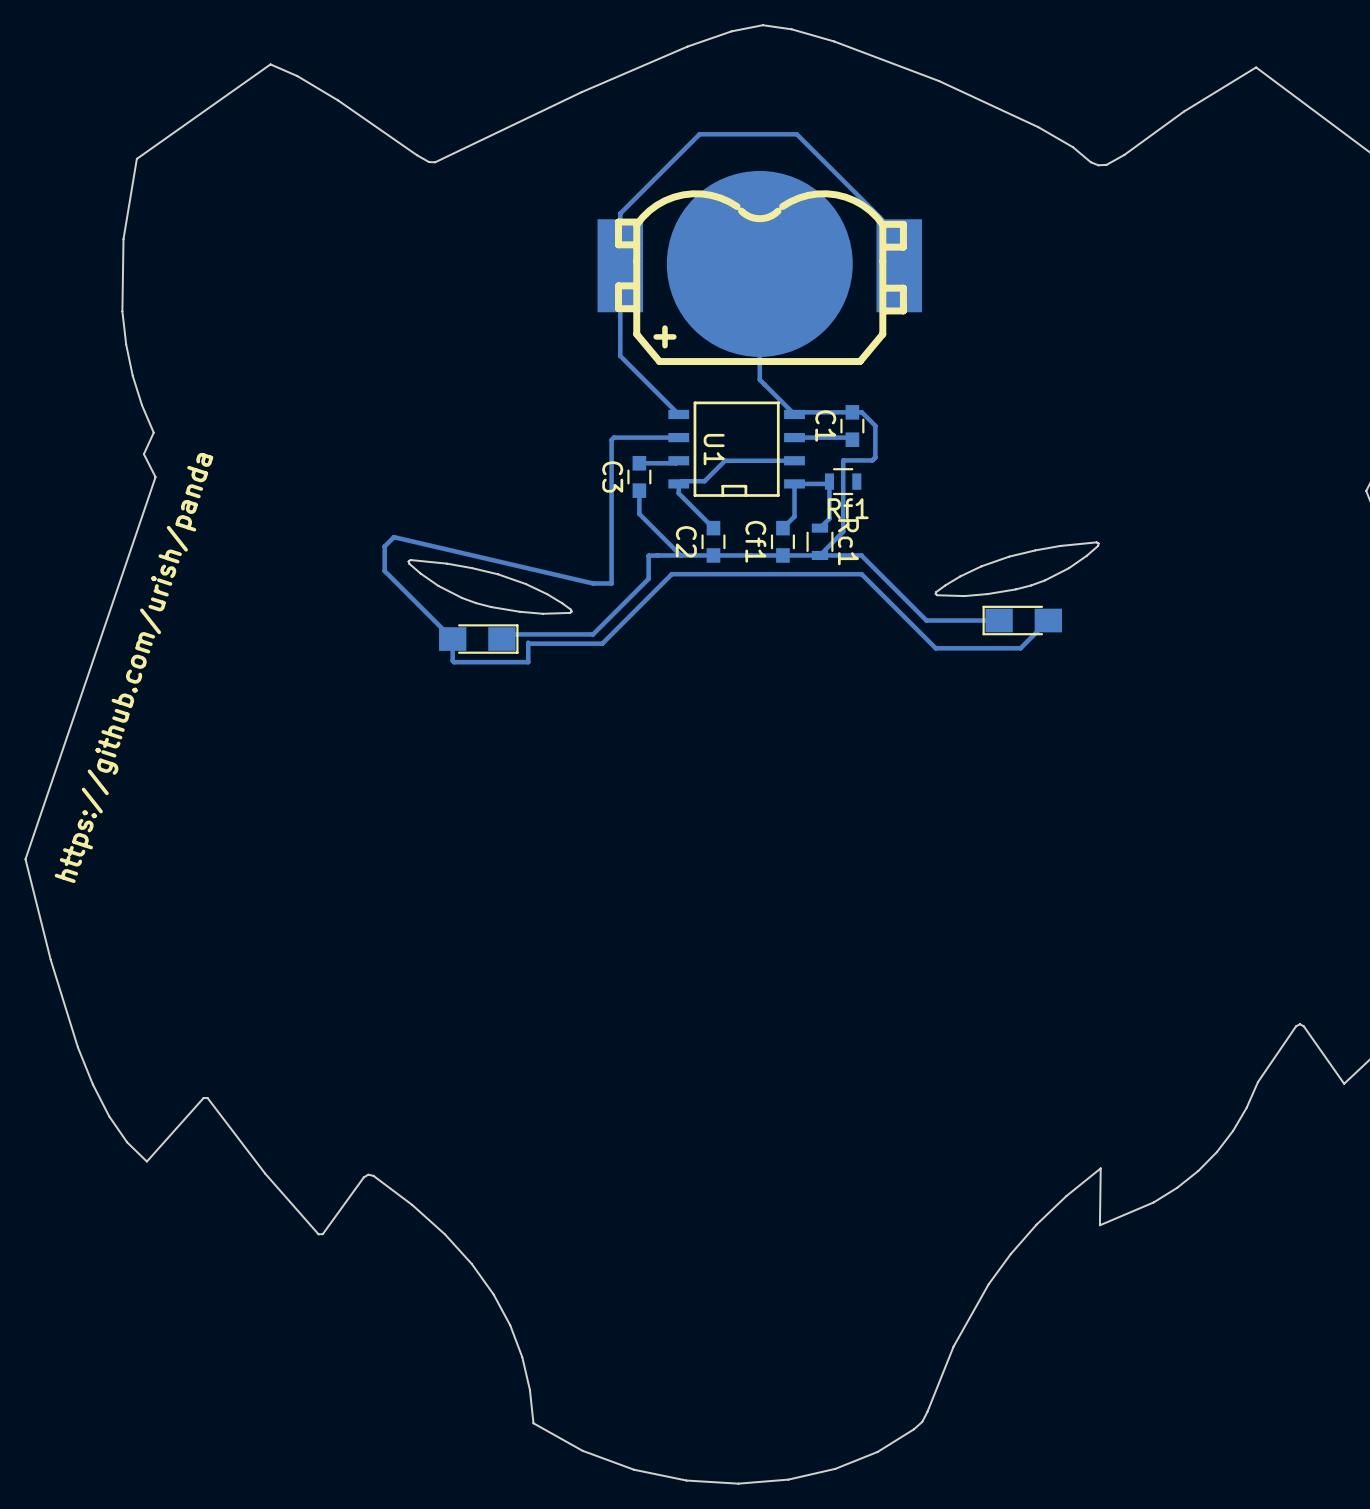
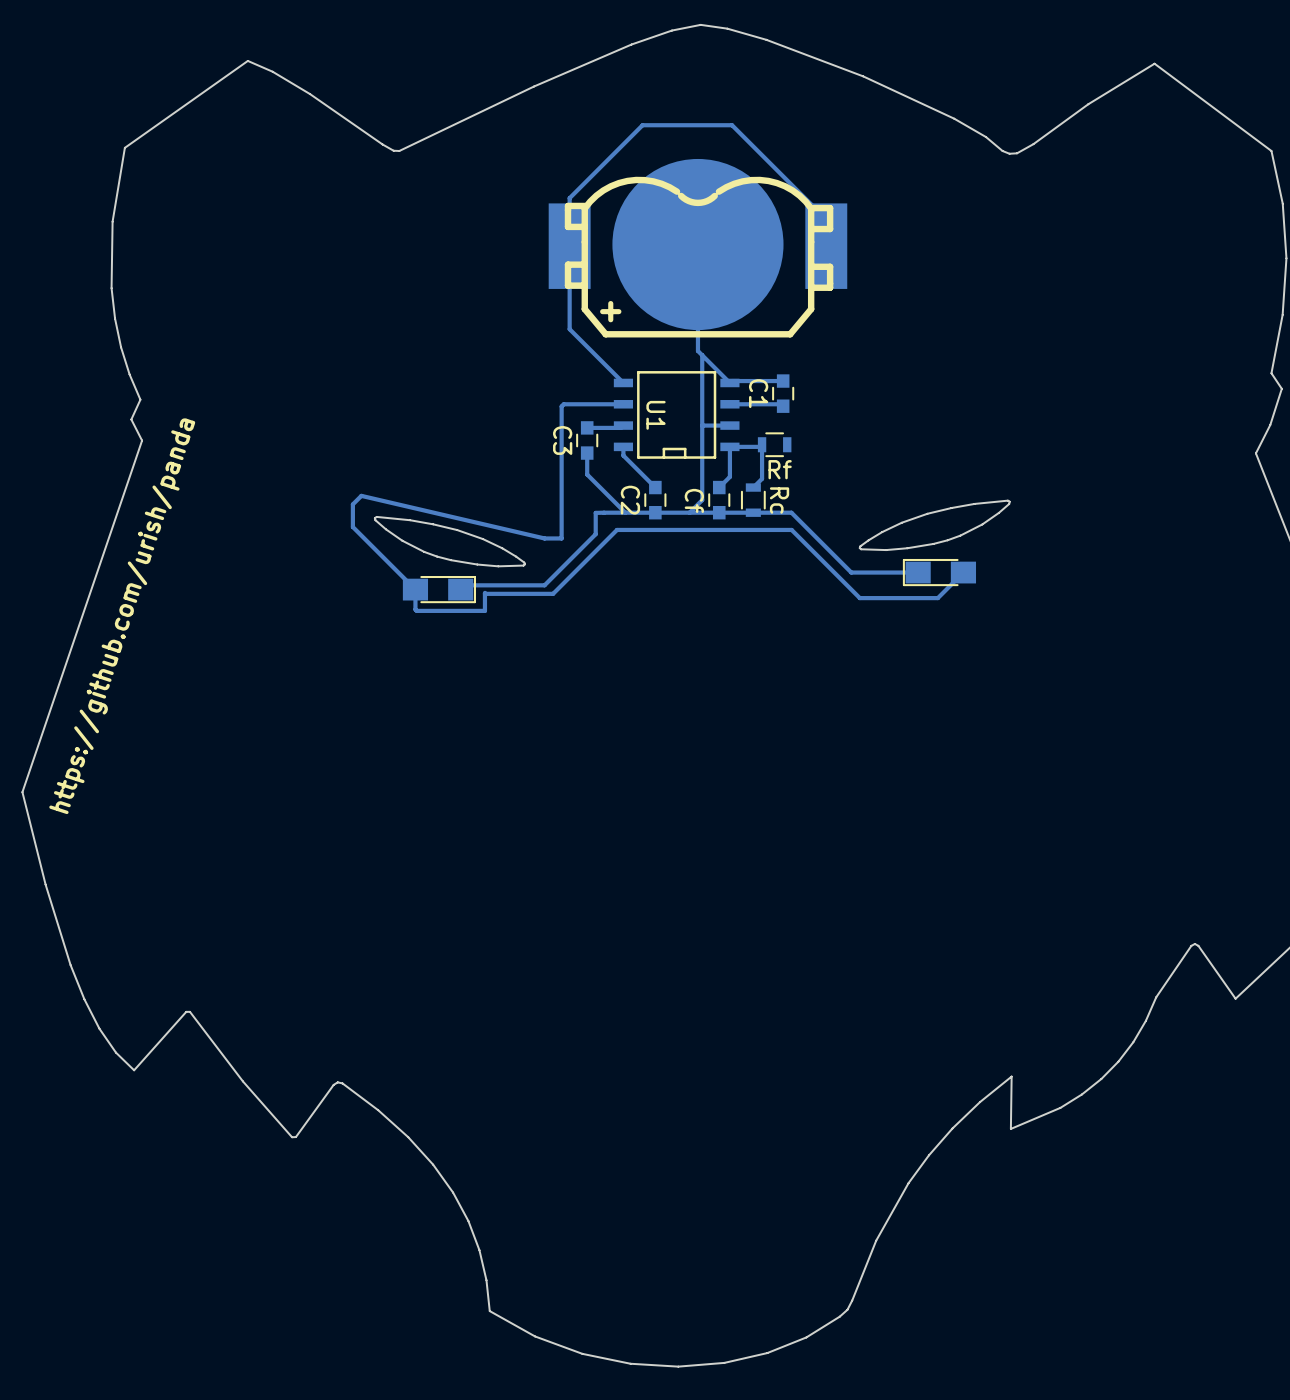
track: none -> (702, 355) (702, 500) (689, 512)
track: (852, 412) (861, 412) (875, 425) (875, 457) (872, 460) (843, 460) (843, 531) (819, 555) -> none
track: (764, 460) (725, 460) (704, 481) (681, 481) (678, 483) -> none
Rf1 name: Rf1 (848, 508) -> Rf (780, 469)
Cf1 name: Cf1 (755, 541) -> Cf (694, 500)
Rc1 name: Rc1 (848, 542) -> Rc (779, 500)

